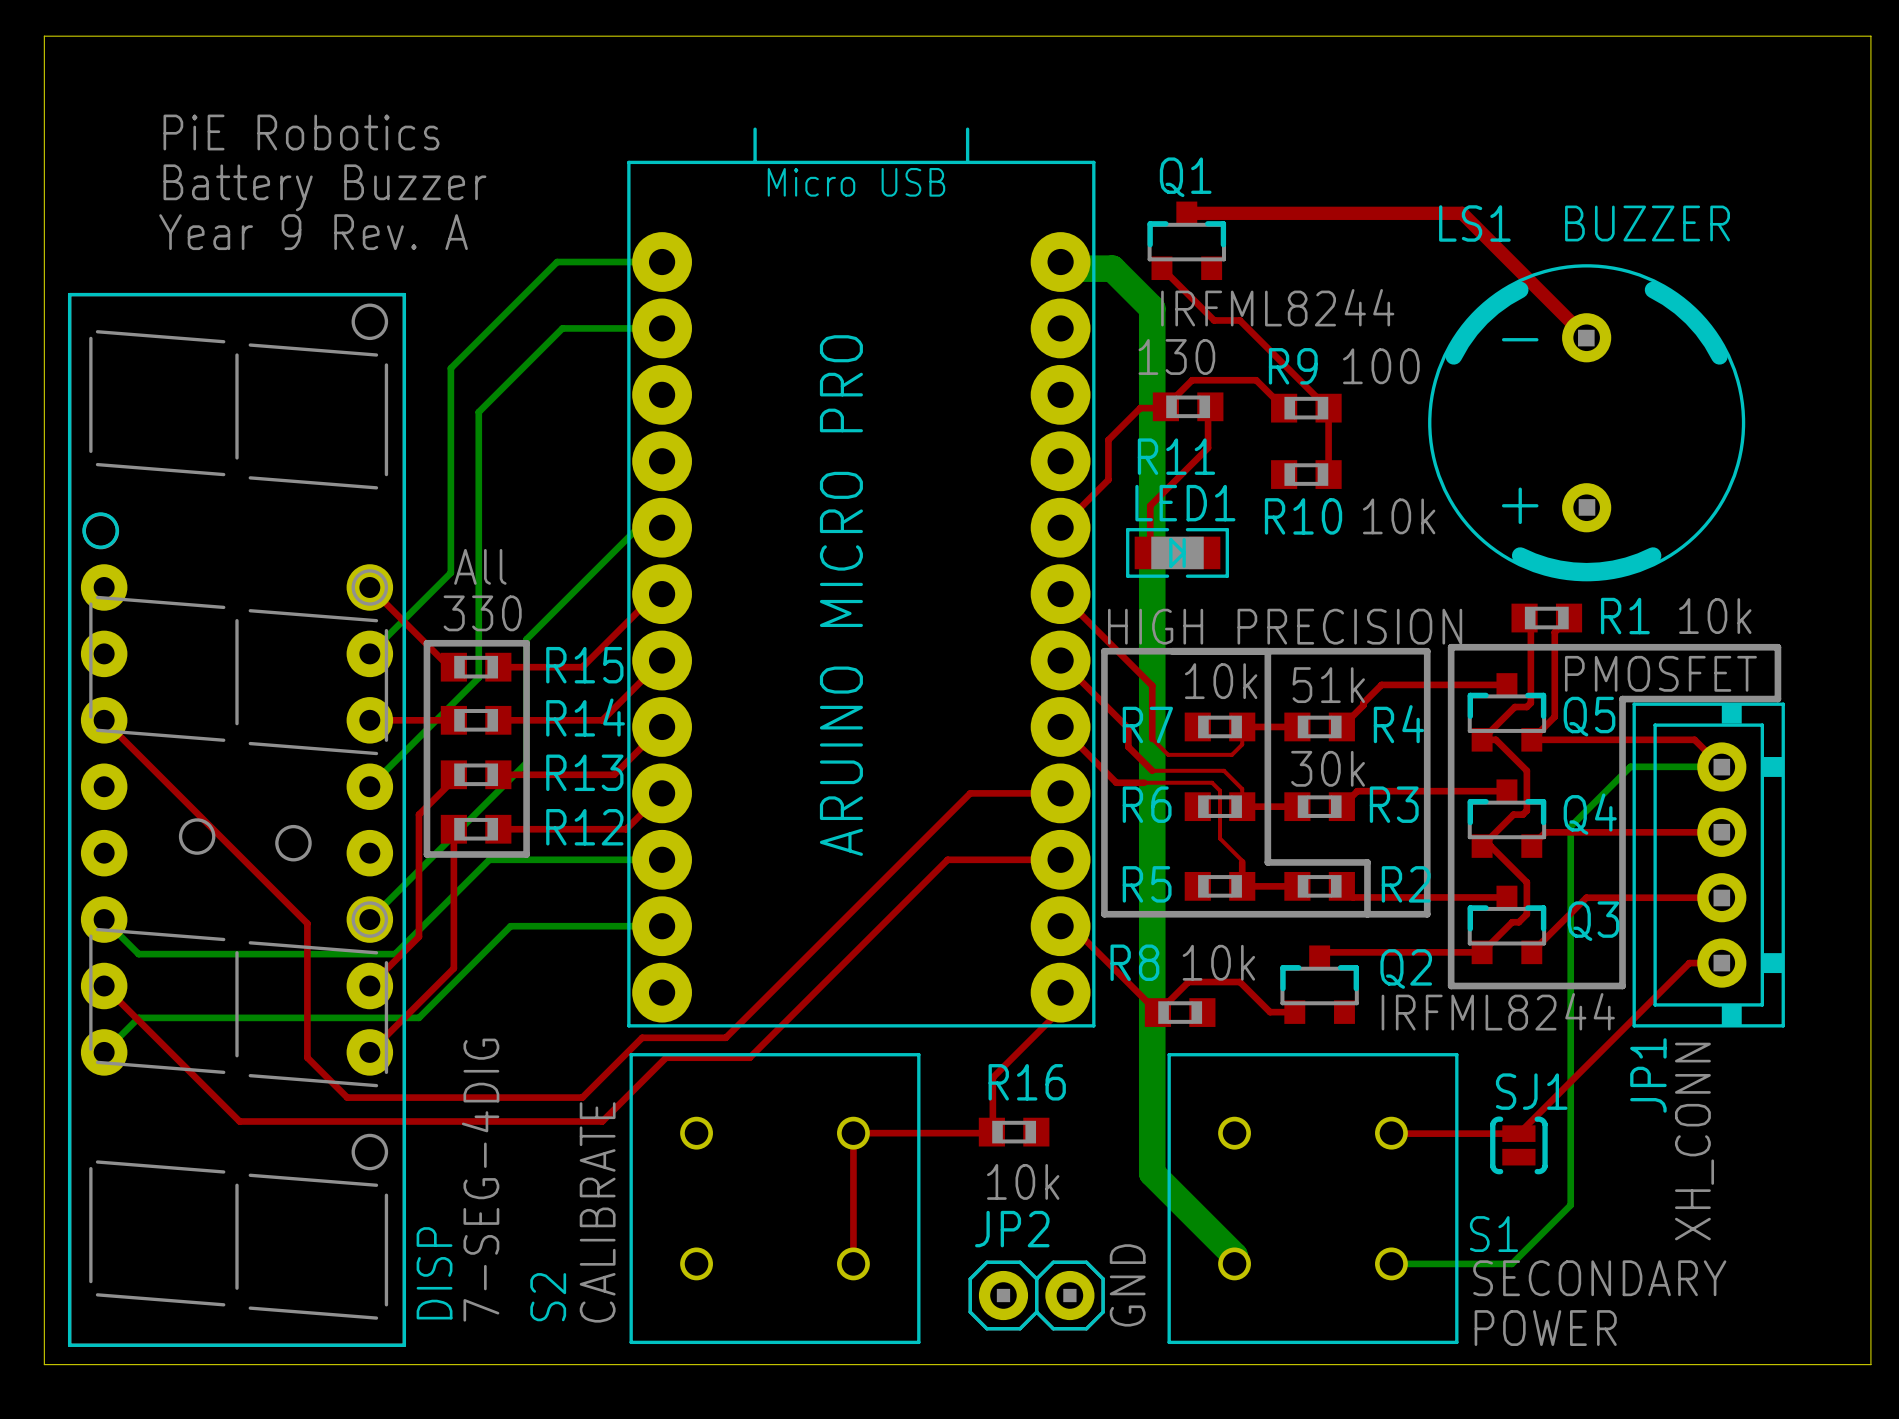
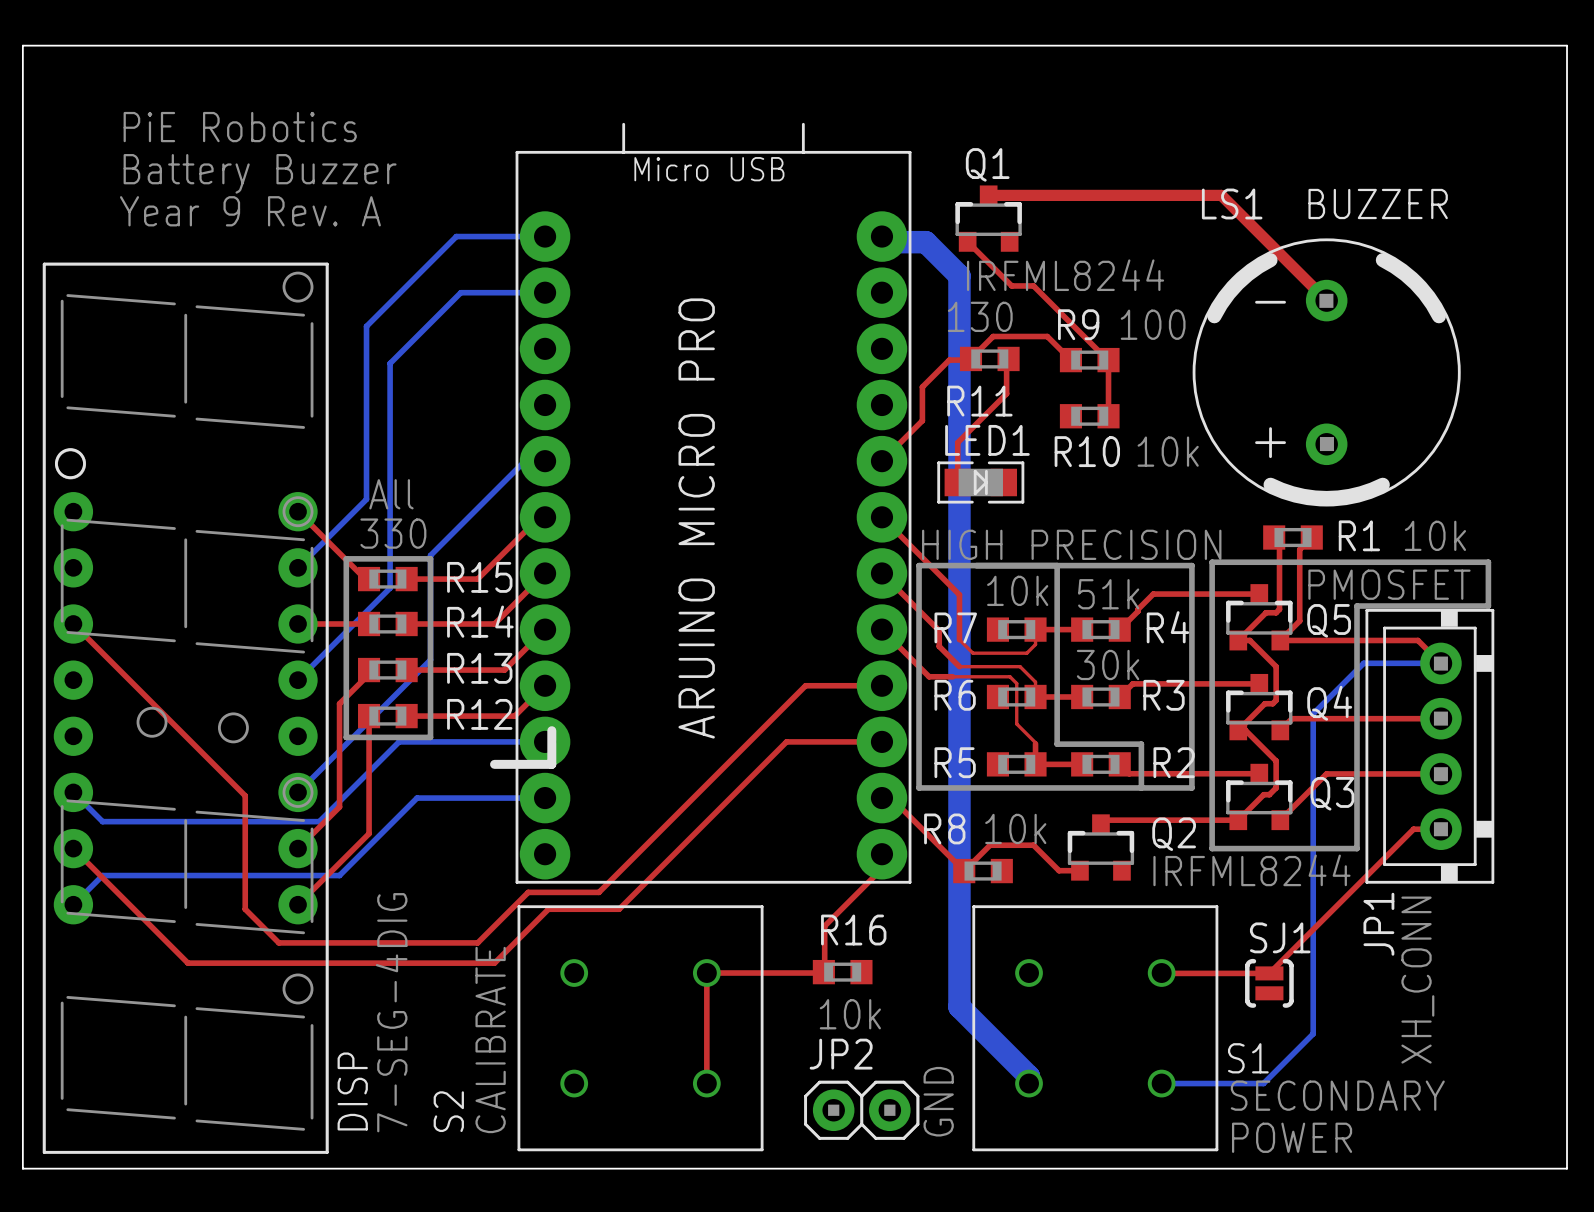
line: none -> (551, 730) (551, 764) (494, 764)

